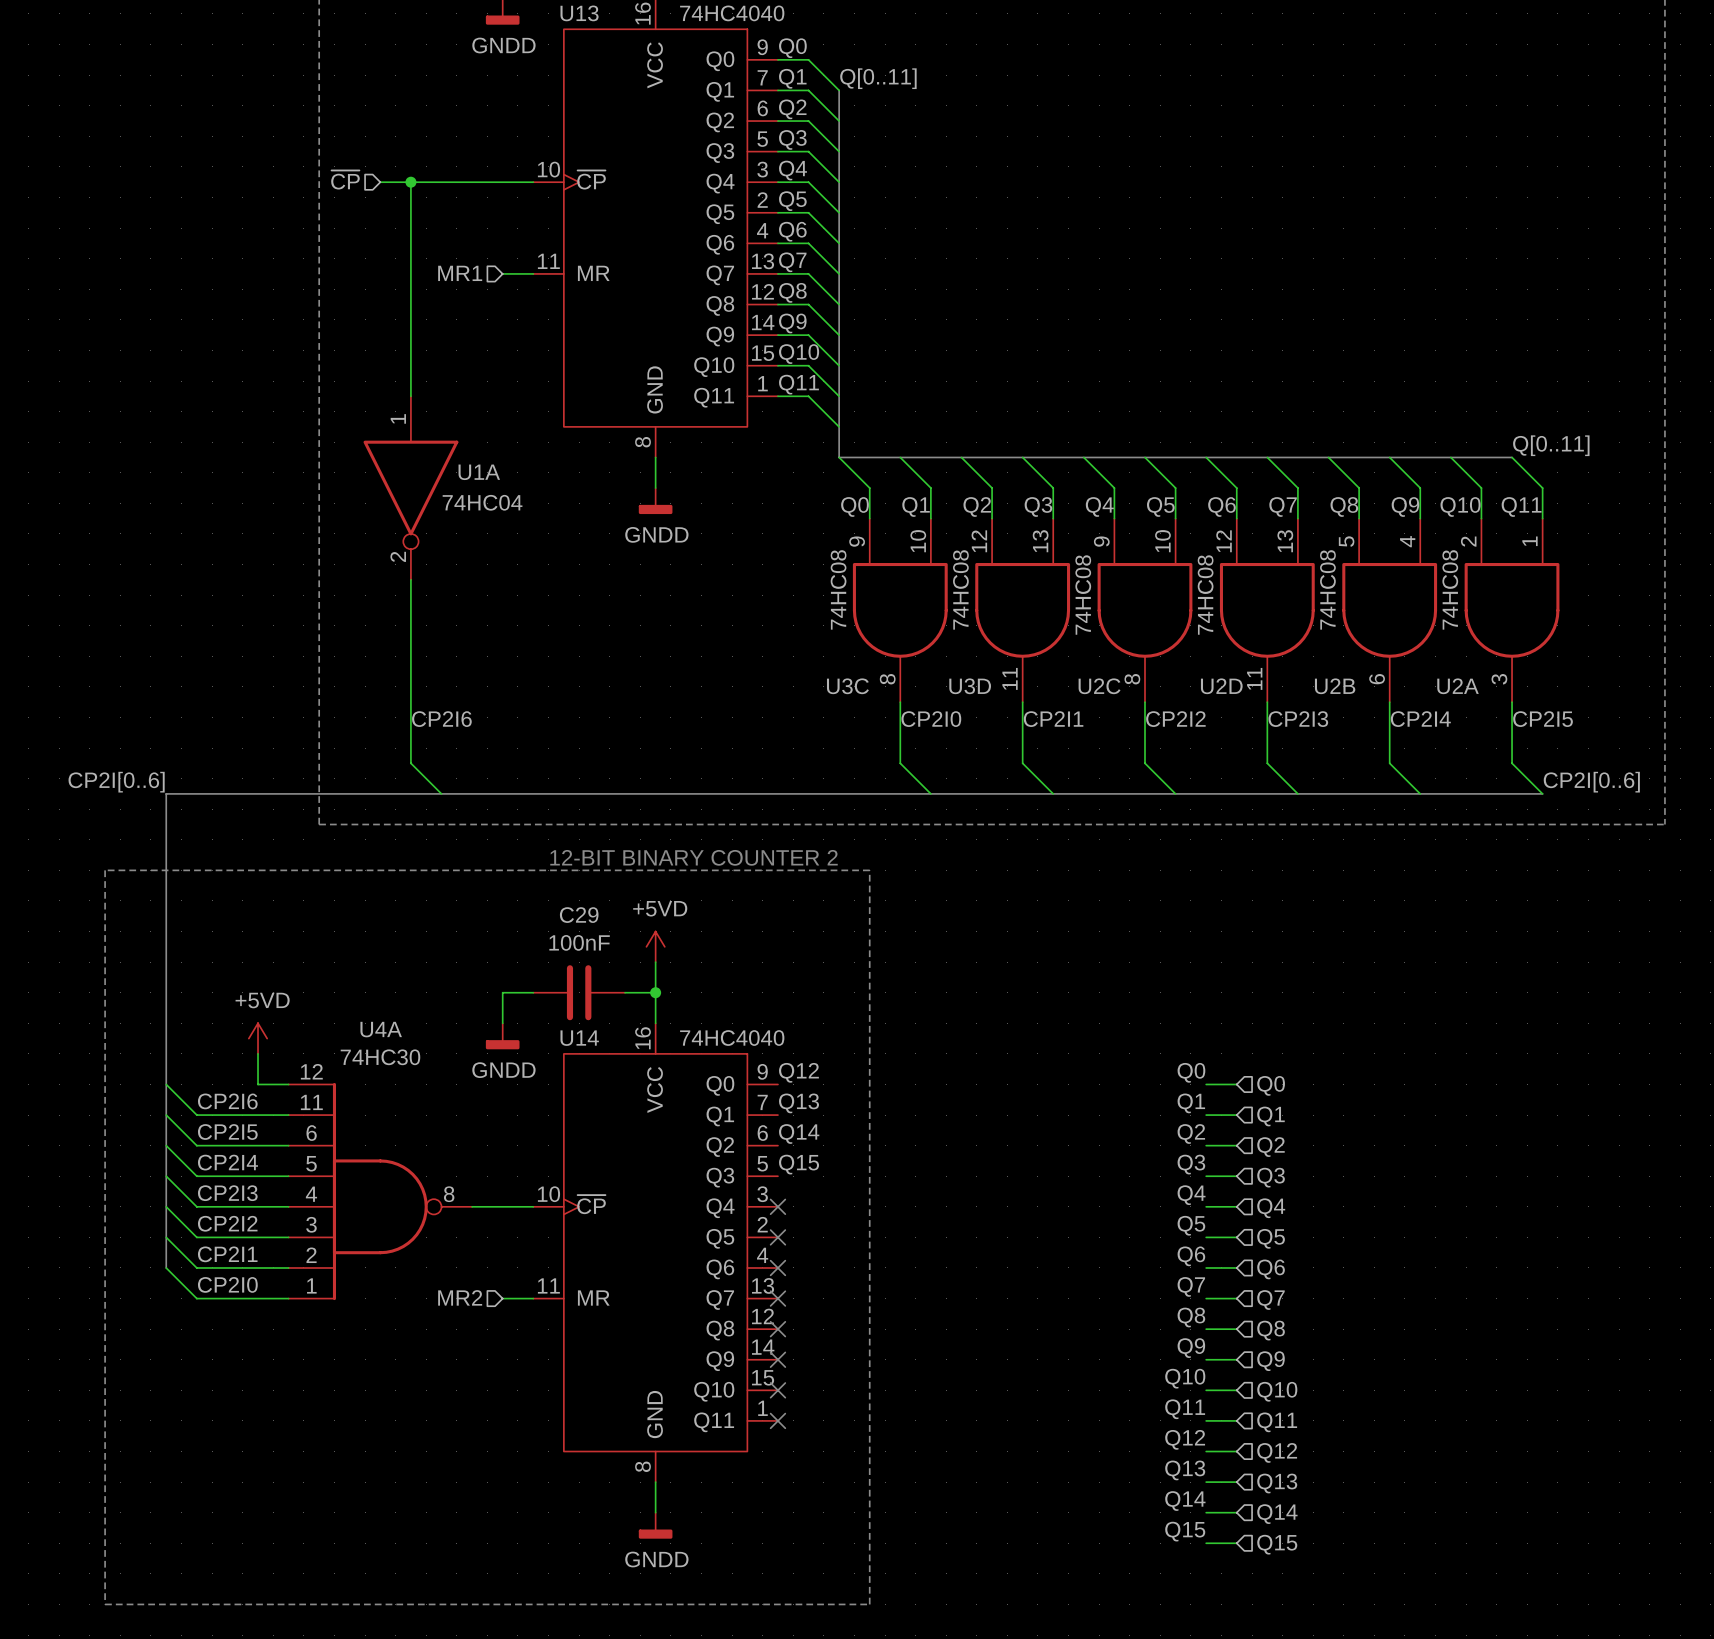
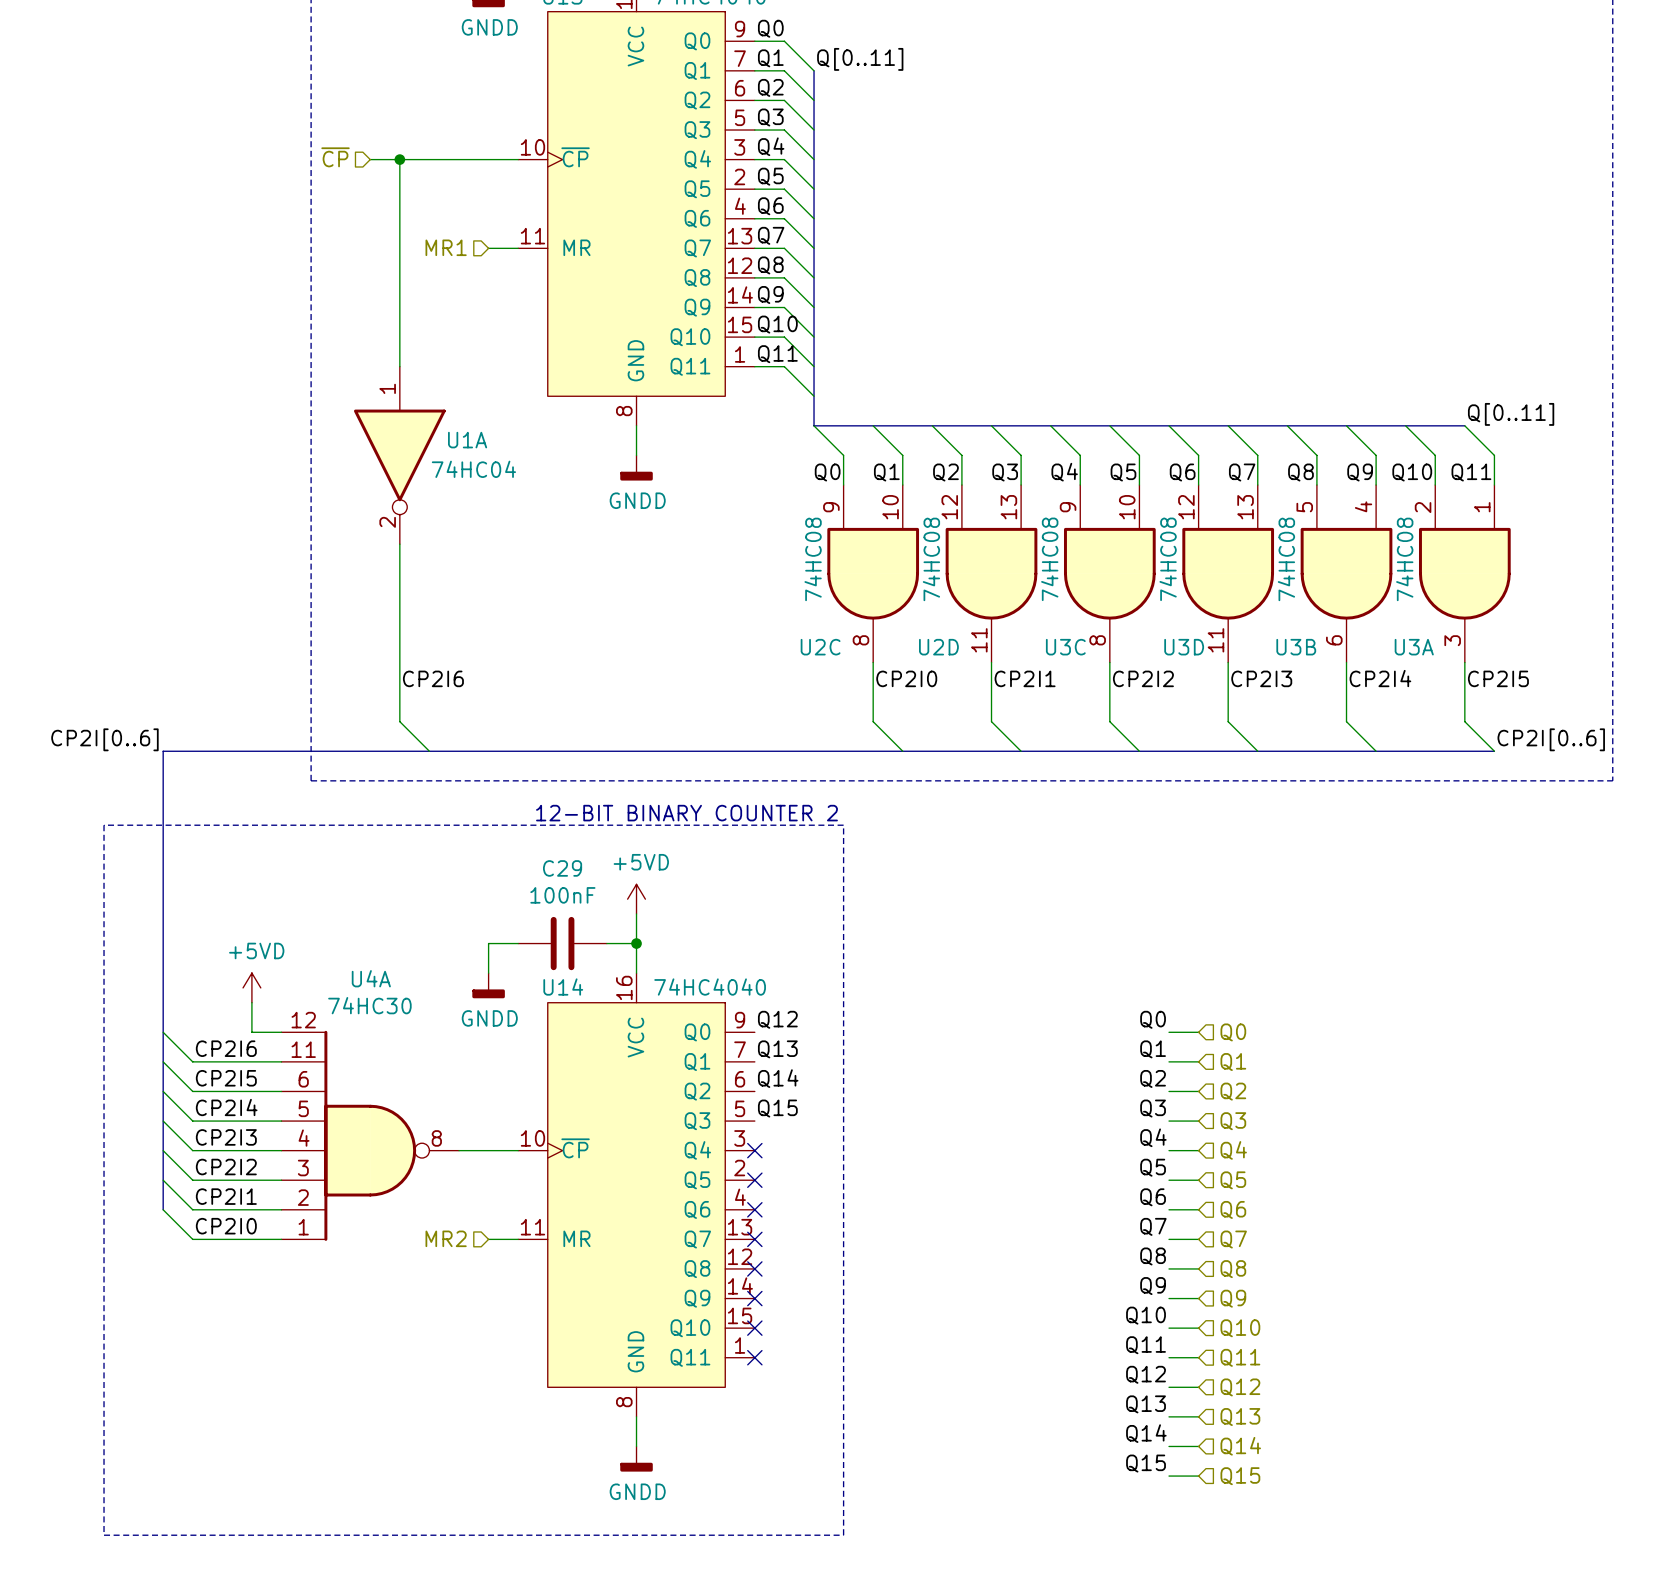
U3C name: U3C (847, 686) -> U2C (820, 647)
U3D name: U3D (970, 686) -> U2D (938, 647)
U2C name: U2C (1099, 686) -> U3C (1065, 647)
U2D name: U2D (1221, 686) -> U3D (1184, 647)
U2B name: U2B (1335, 686) -> U3B (1296, 647)
U2A name: U2A (1458, 686) -> U3A (1414, 647)

